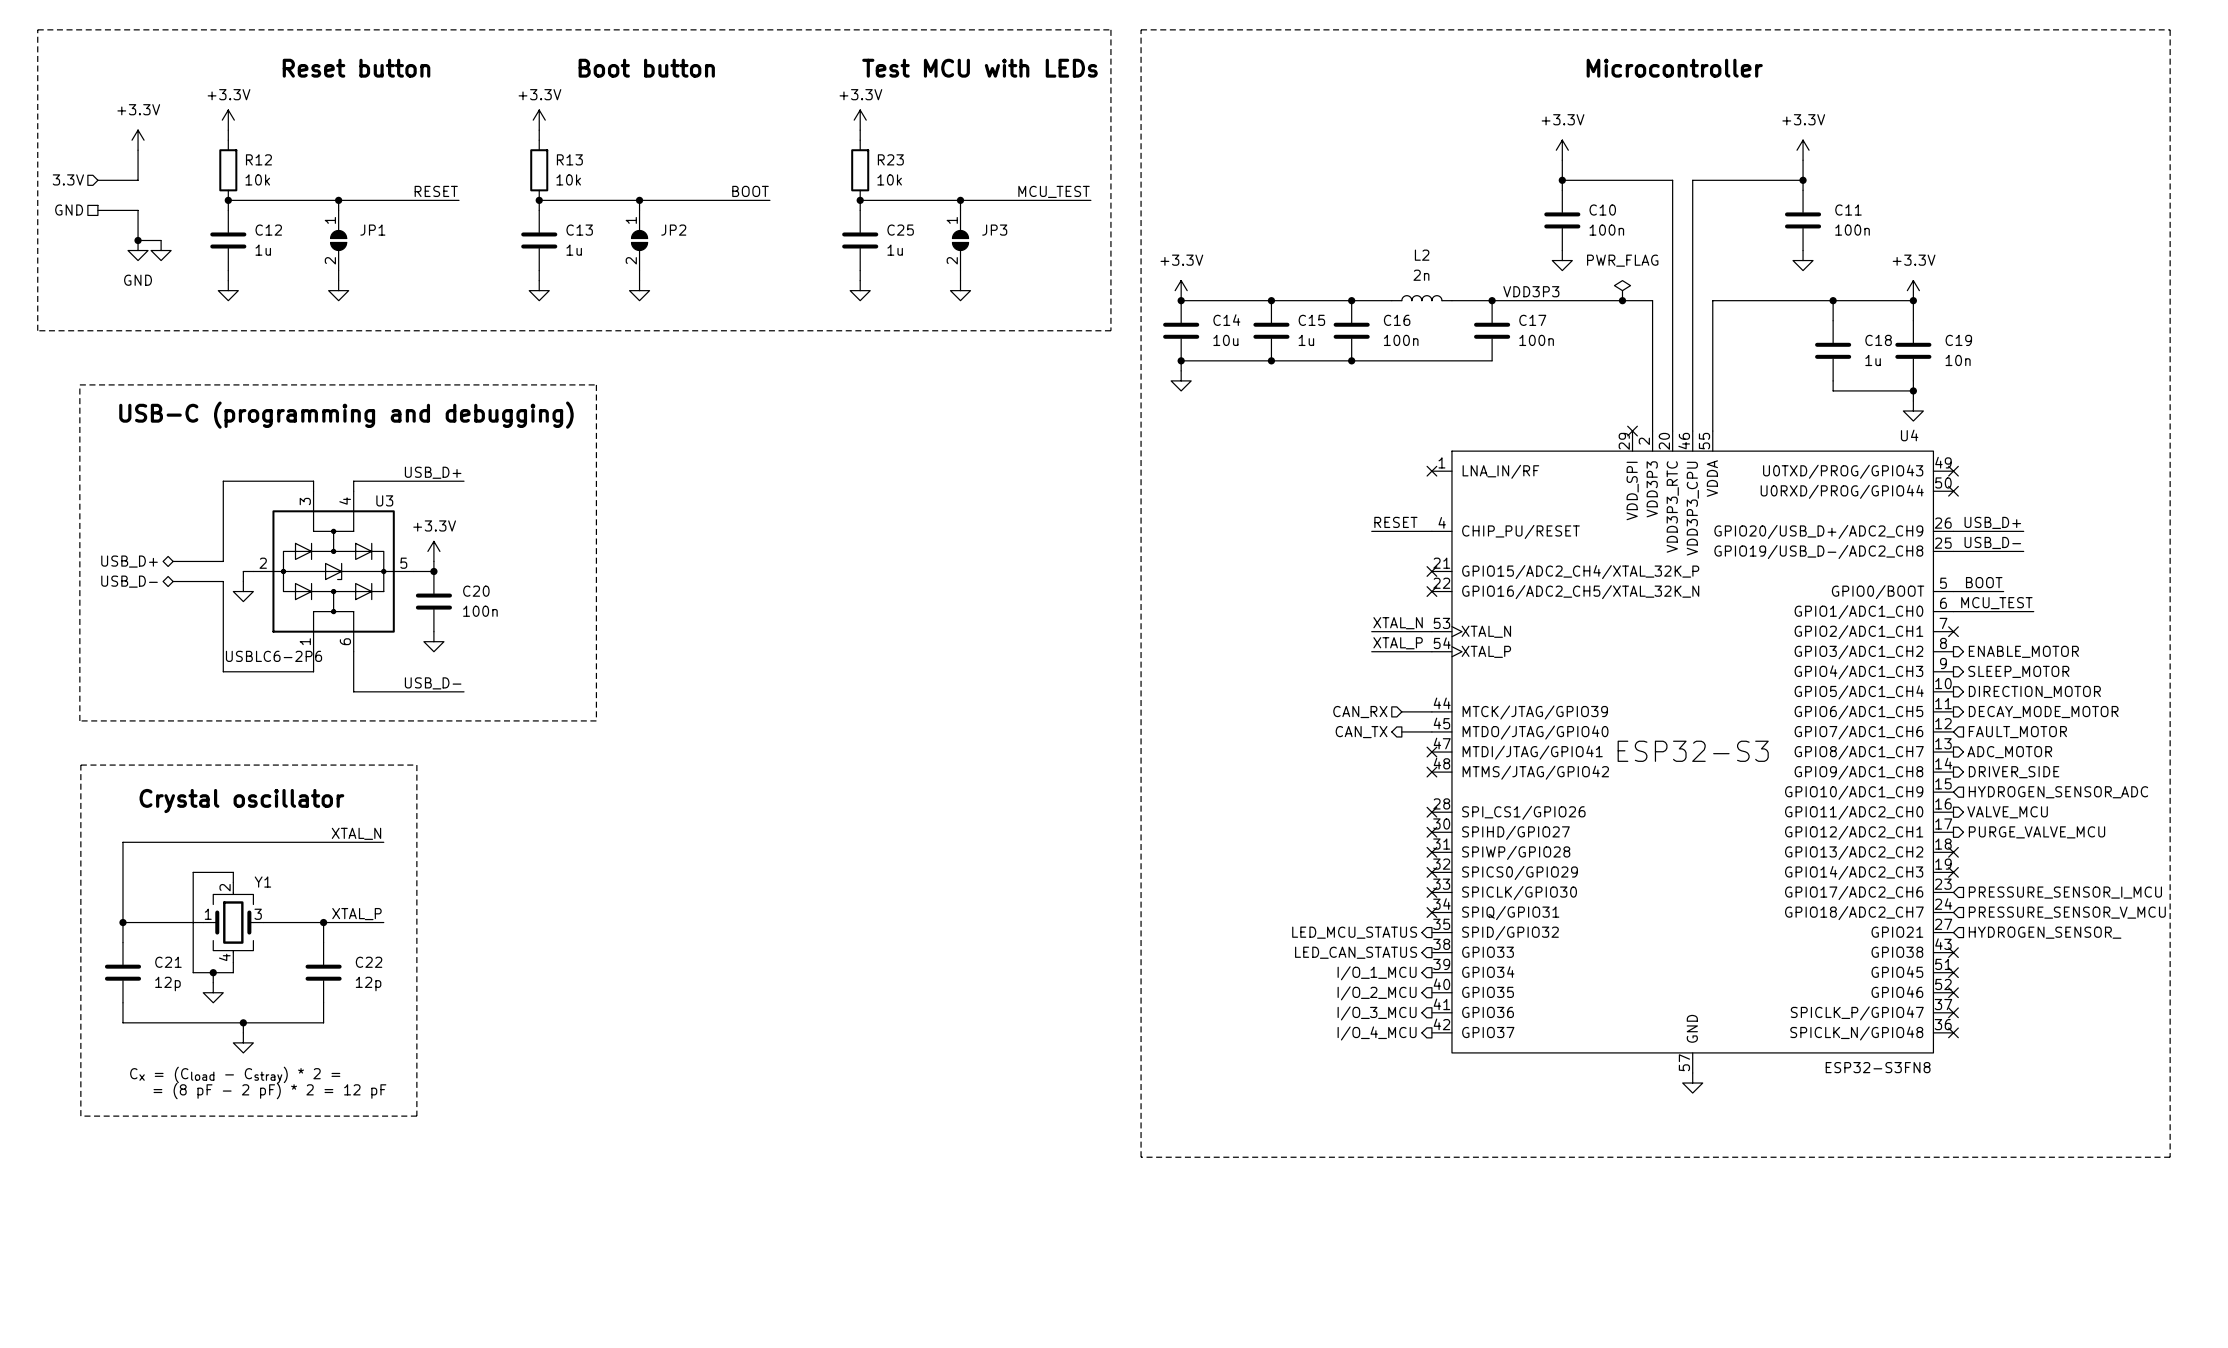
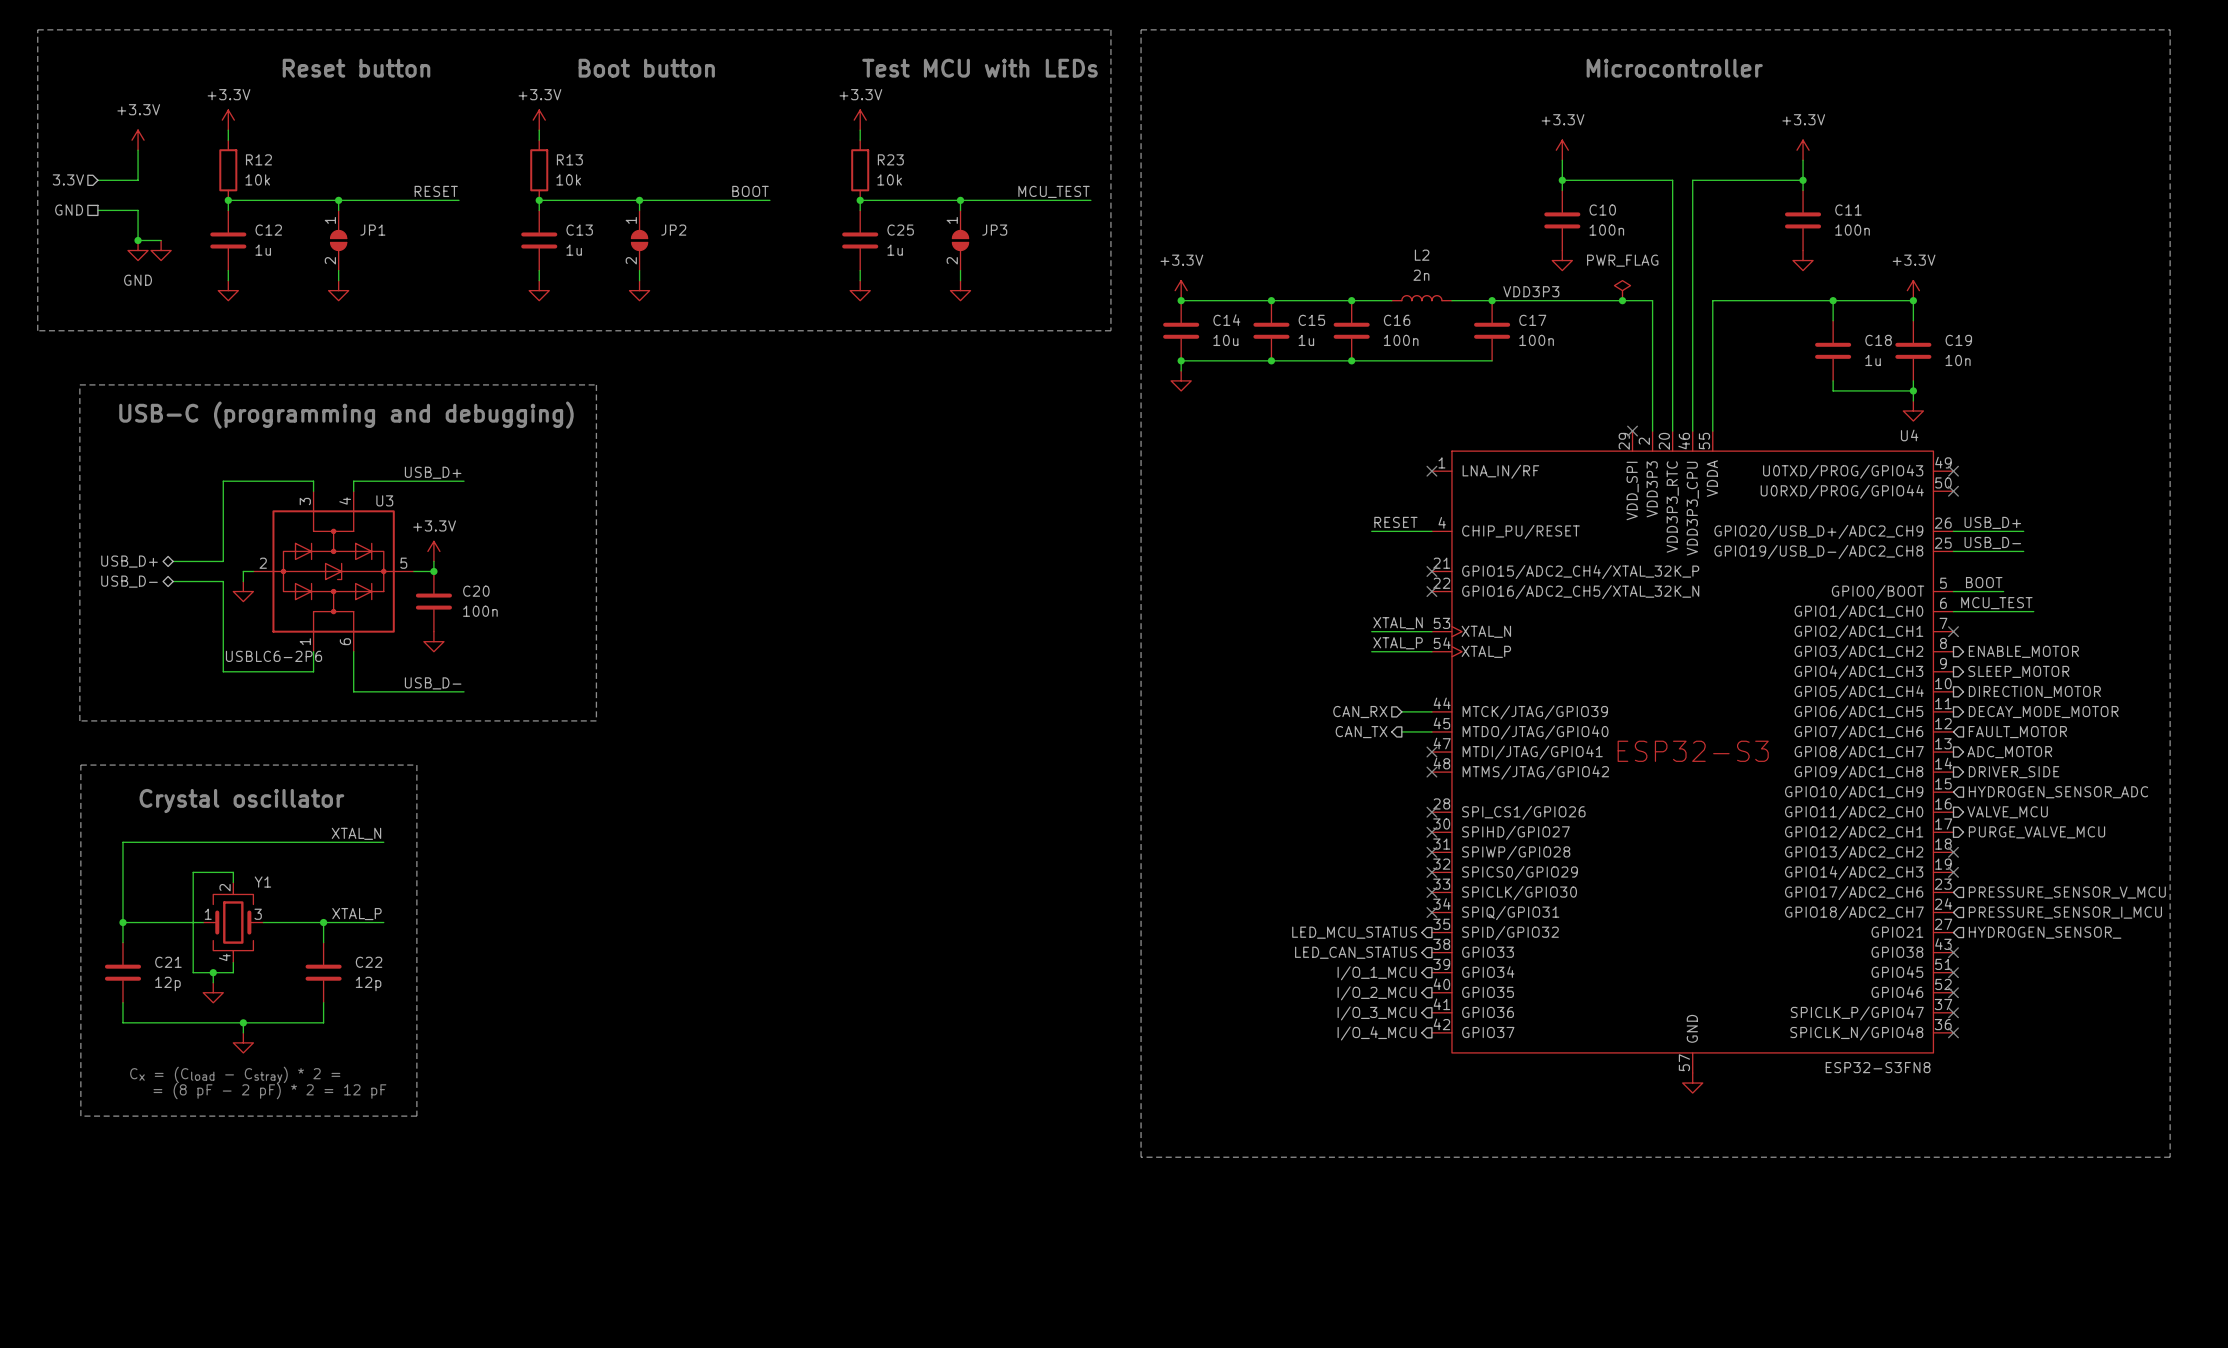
hierarchical label: PRESSURE_SENSOR_I_MCU (2065, 892) -> PRESSURE_SENSOR_V_MCU (2067, 892)
hierarchical label: PRESSURE_SENSOR_V_MCU (2067, 912) -> PRESSURE_SENSOR_I_MCU (2065, 912)

